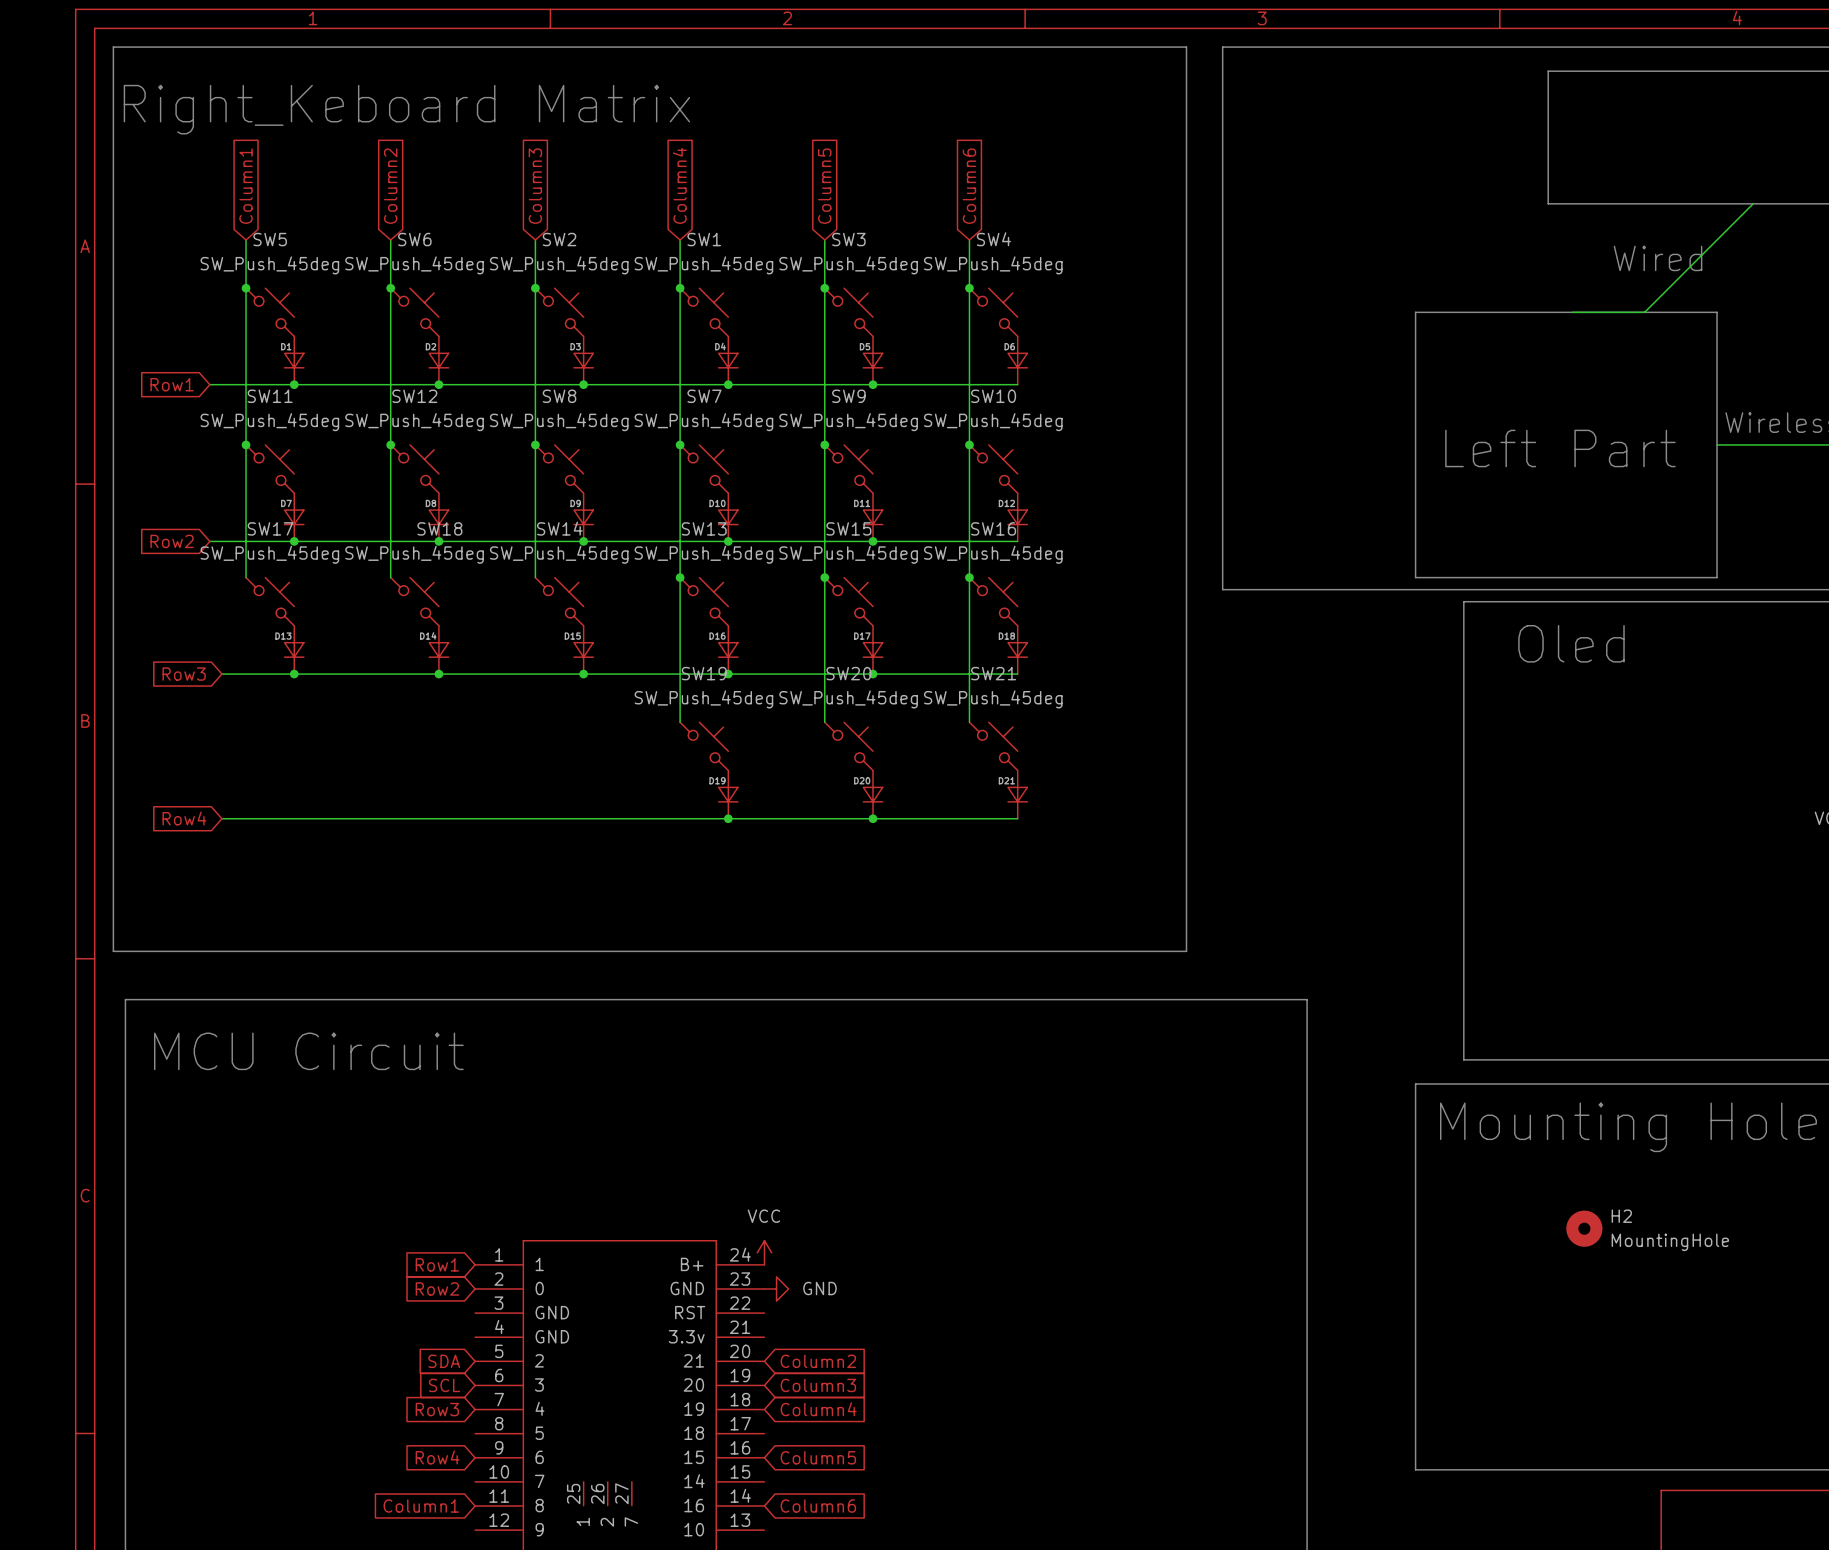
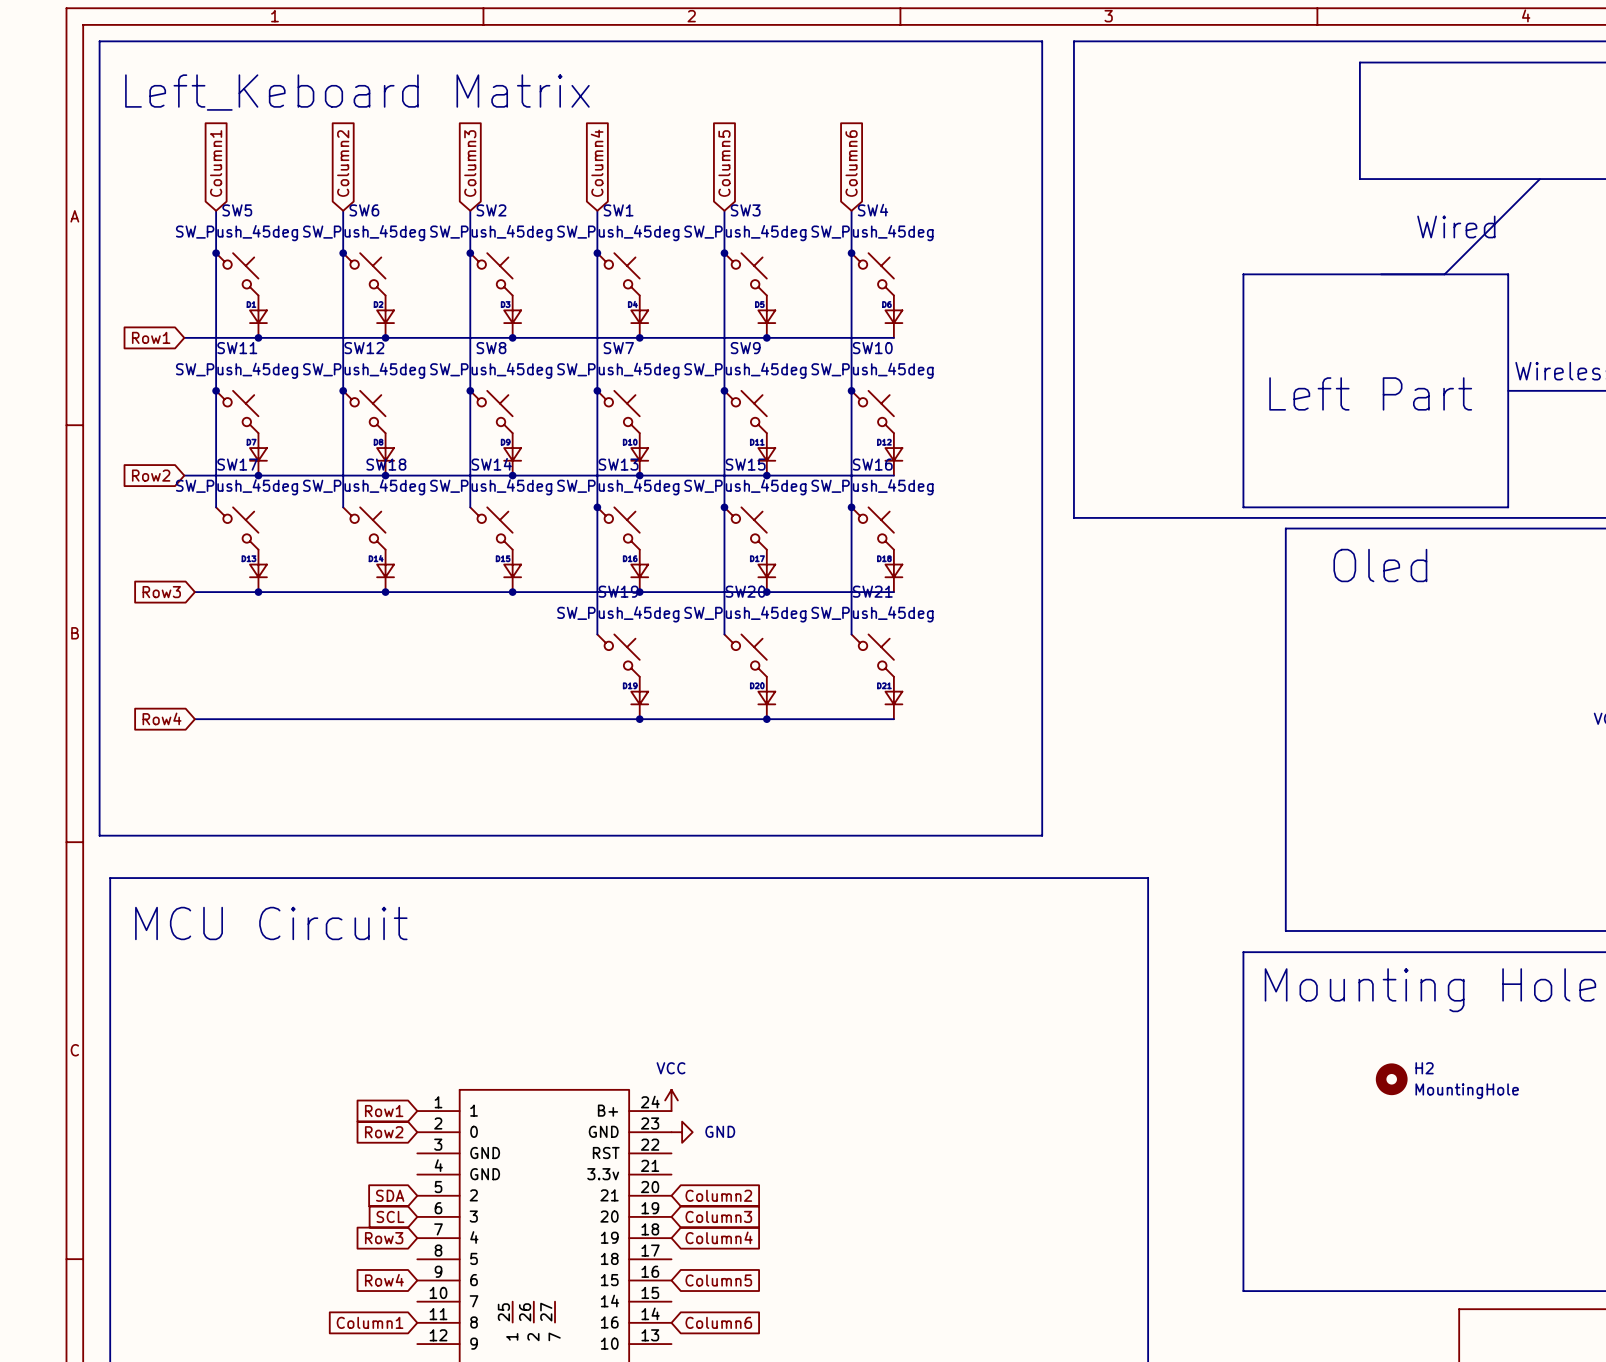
text: Right_Keboard Matrix (406, 109) -> Left_Keboard Matrix (357, 92)

